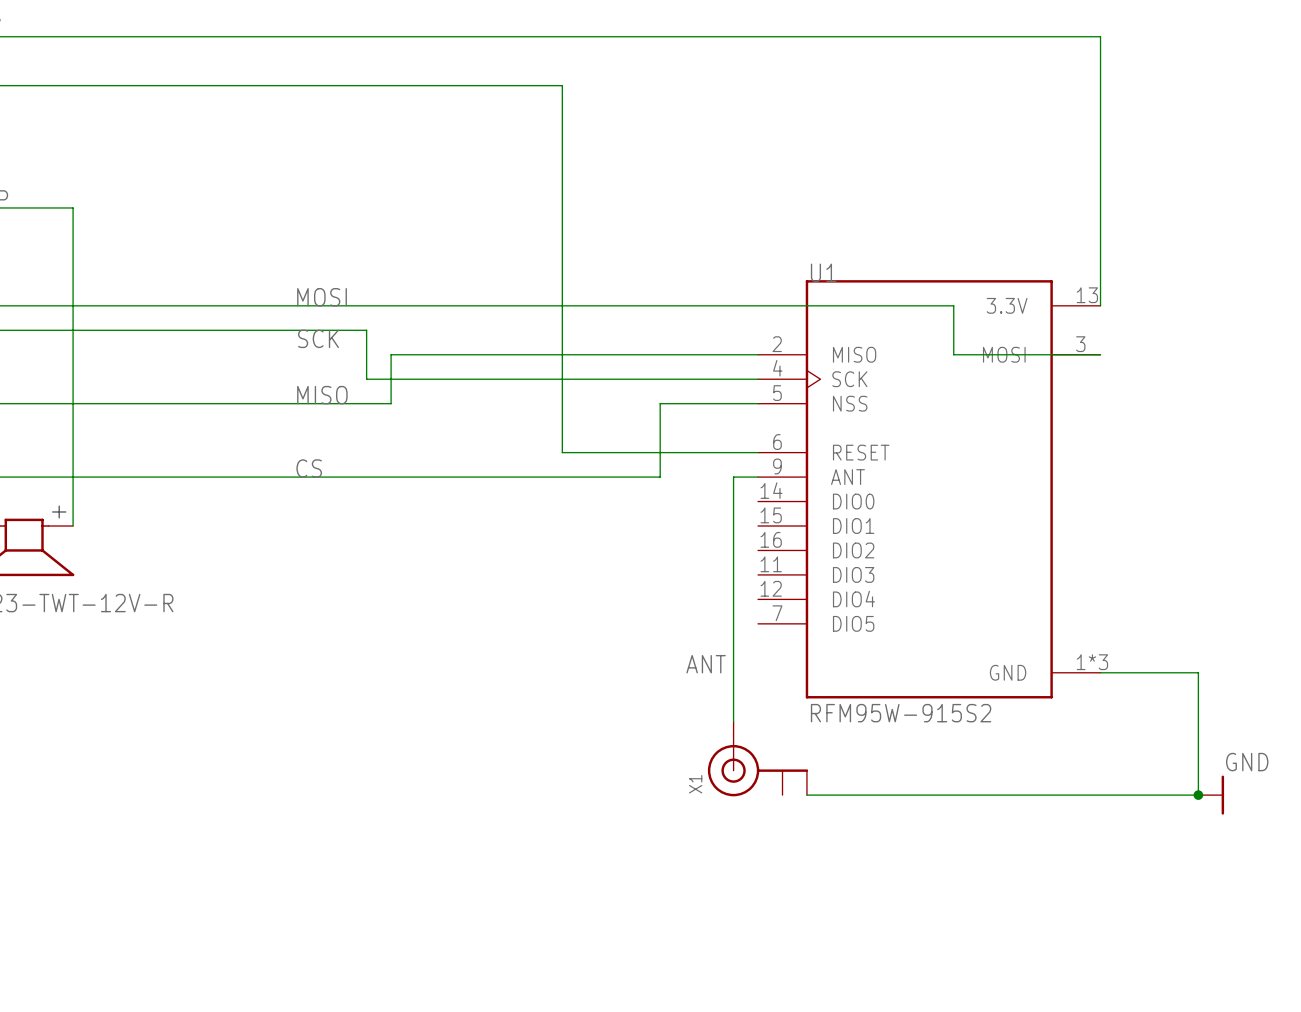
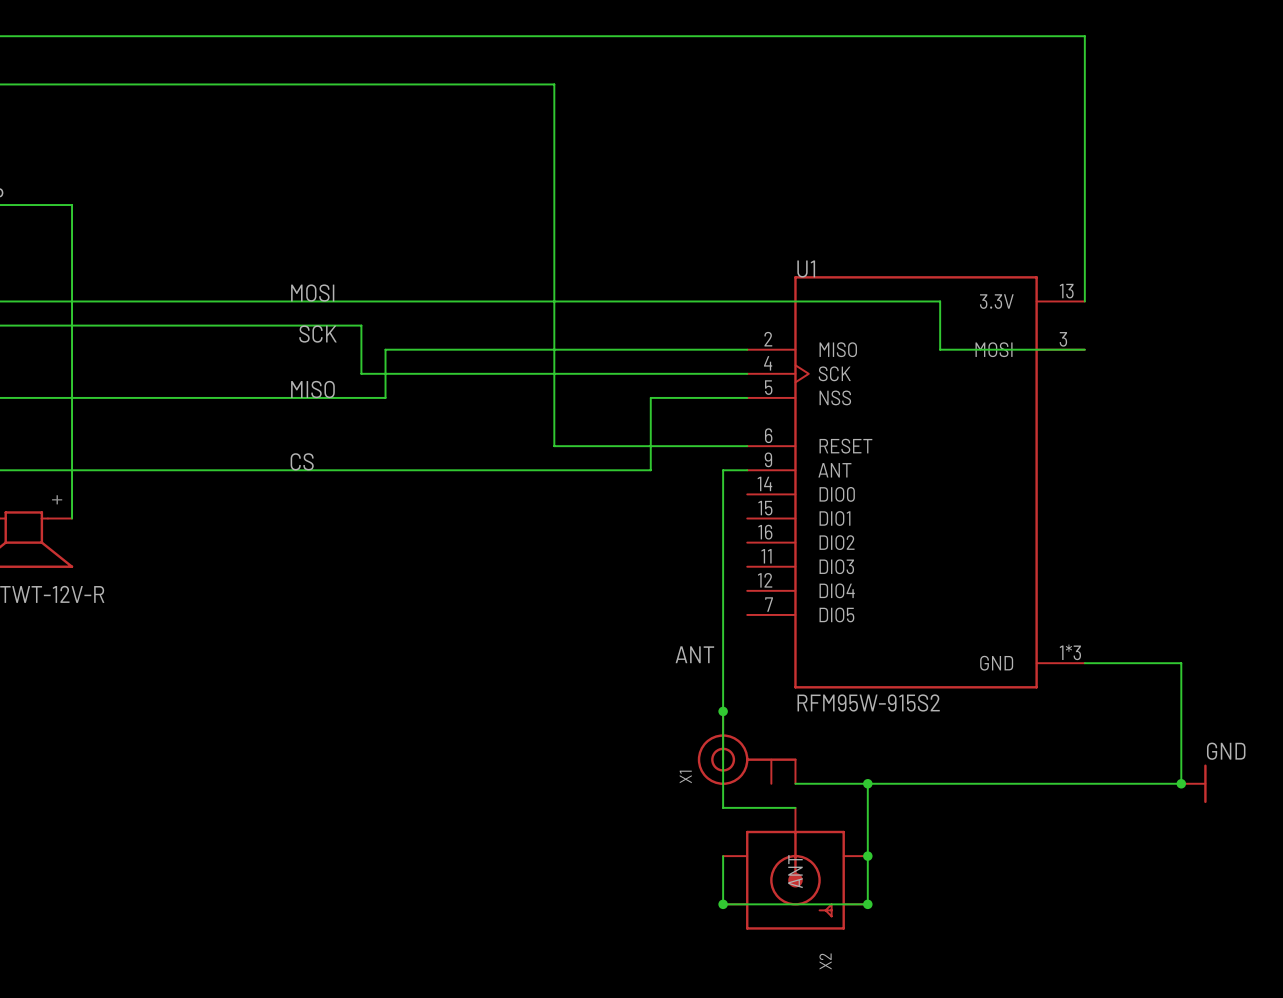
wire: none -> (723, 711) (723, 807) (795, 807)
junction: none -> (723, 711)
wire: none -> (867, 783) (867, 904) (723, 904) (723, 856)
junction: none -> (867, 783)
junction: none -> (867, 856)
X2: none -> (795, 868)
junction: none -> (723, 904)
junction: none -> (867, 904)

